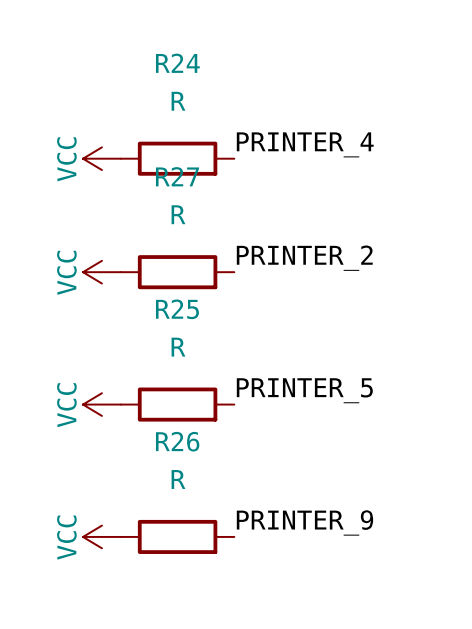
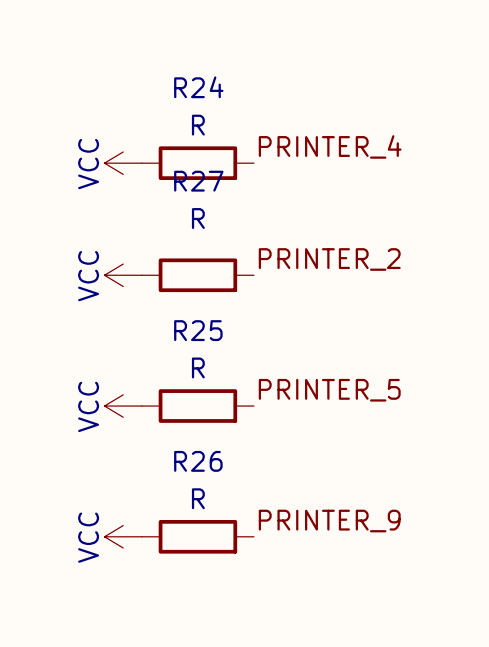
R24 name position: R24 (177, 63) -> R24 (198, 87)
R24 value position: R (178, 101) -> R (198, 125)
R25 name position: R25 (177, 309) -> R25 (198, 330)
R25 value position: R (178, 347) -> R (198, 367)
R26 name position: R26 (177, 441) -> R26 (198, 461)
R26 value position: R (178, 479) -> R (198, 498)

